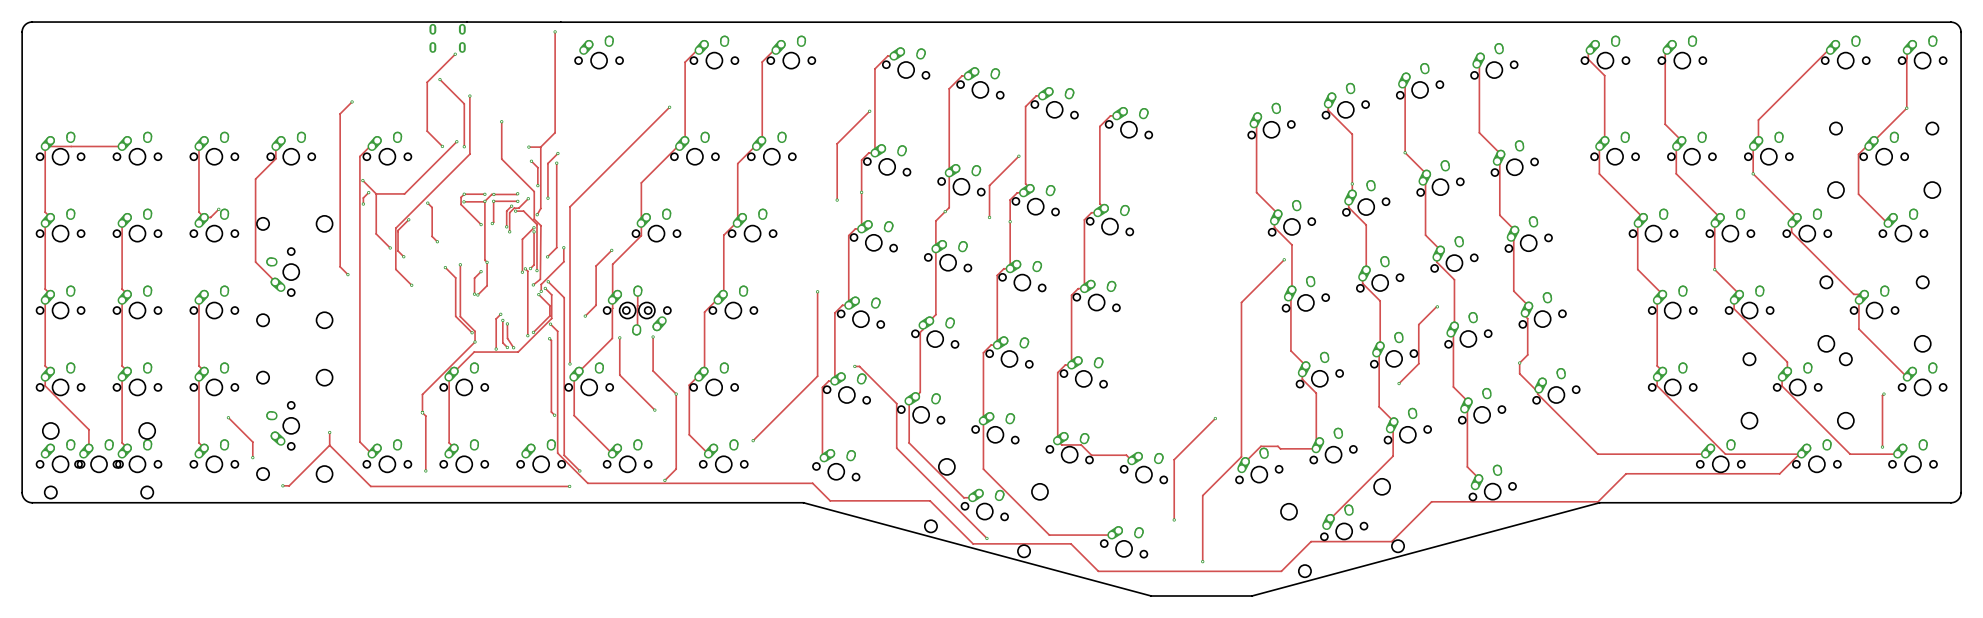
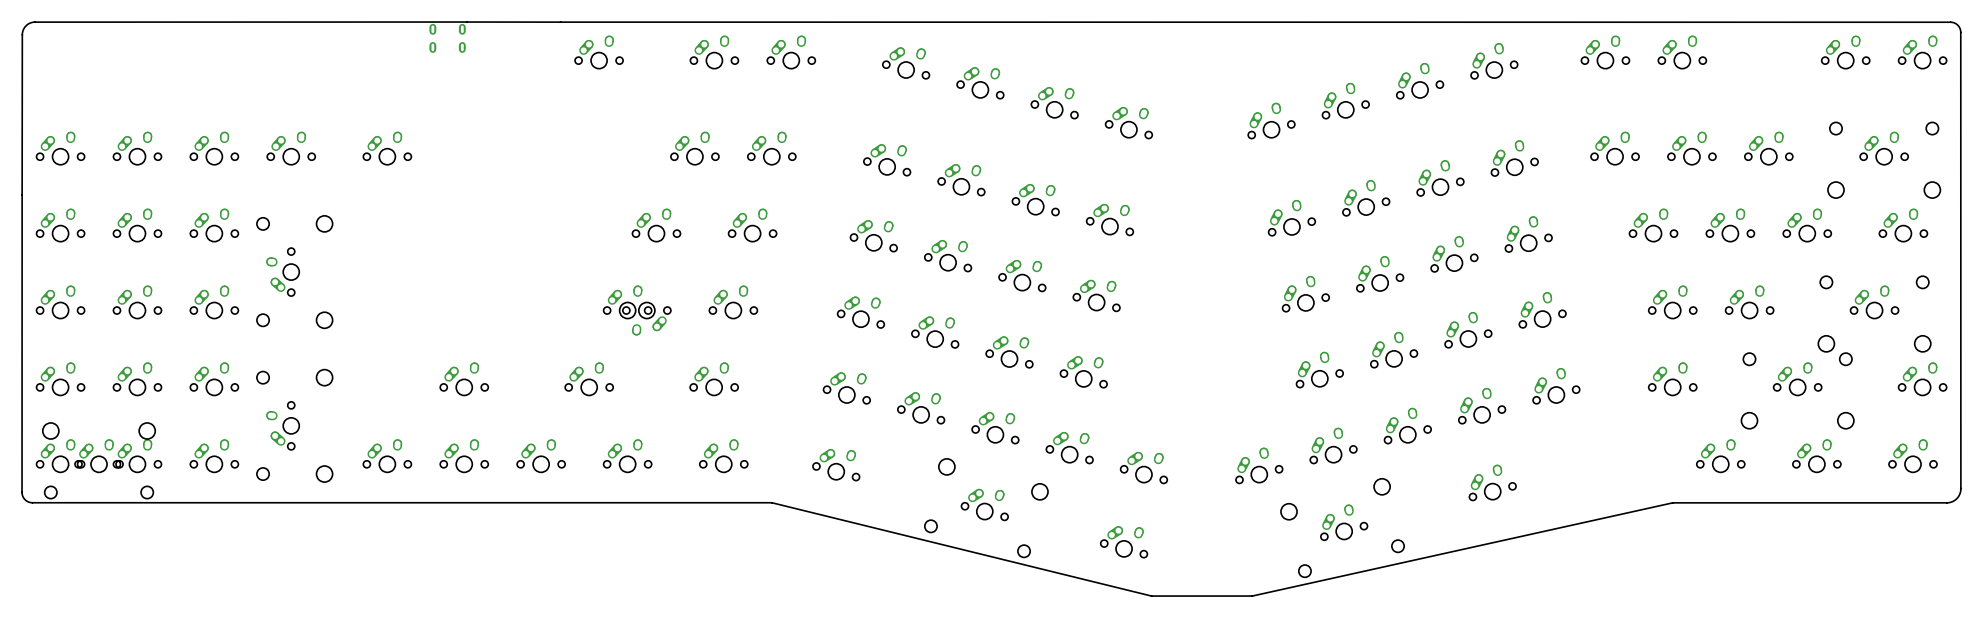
track: (555, 31) (555, 132) (540, 147) (528, 147) -> none
via: (555, 31) -> none
track: (699, 50) (685, 62) (685, 140) -> none
track: (775, 50) (762, 62) (762, 140) -> none
track: (1588, 50) (1588, 59) (1604, 75) (1604, 140) -> none
track: (1665, 50) (1665, 124) (1681, 140) -> none
track: (1830, 50) (1758, 120) (1758, 140) -> none
track: (1907, 50) (1906, 108) (1858, 154) (1858, 194) (1887, 223) -> none
track: (455, 54) (427, 82) (427, 131) (442, 146) -> none
via: (455, 54) -> none
track: (893, 56) (887, 56) (874, 68) (874, 153) (868, 153) (861, 160) (861, 228) (855, 228) (848, 235) (848, 305) (842, 305) (834, 312) (834, 381) (828, 381) (822, 387) (822, 456) (824, 457) -> none
track: (1476, 64) (1479, 66) (1479, 132) (1500, 154) -> none
track: (968, 76) (962, 76) (949, 88) (949, 207) (935, 220) (935, 314) (929, 320) -> none
track: (439, 79) (464, 103) (464, 146) -> none
via: (439, 79) -> none
track: (1402, 84) (1405, 86) (1405, 152) (1426, 174) -> none
track: (1042, 95) (1036, 95) (1025, 106) (1025, 183) (1030, 188) -> none
track: (469, 96) (469, 154) (395, 228) (395, 269) (411, 285) -> none
via: (469, 96) -> none
track: (352, 101) (340, 113) (340, 266) (347, 274) -> none
via: (352, 101) -> none
track: (1328, 103) (1328, 110) (1352, 134) (1352, 194) -> none
track: (669, 107) (570, 206) (570, 363) -> none
via: (669, 107) -> none
via: (1906, 108) -> none
track: (869, 111) (837, 143) (837, 200) -> none
via: (869, 111) -> none
track: (1116, 115) (1110, 115) (1099, 126) (1099, 203) (1104, 208) -> none
track: (501, 121) (501, 159) (534, 191) (534, 219) (540, 225) (540, 279) (533, 284) -> none
via: (501, 121) -> none
track: (1254, 123) (1256, 126) (1256, 192) (1278, 213) -> none
track: (456, 141) (404, 193) (376, 193) -> none
via: (456, 141) -> none
track: (122, 146) (45, 146) (45, 212) (50, 217) -> none
track: (198, 146) (198, 212) (204, 217) (210, 217) (218, 209) -> none
track: (275, 146) (275, 158) (255, 179) (255, 262) (281, 287) -> none
track: (371, 146) (359, 156) (359, 441) (371, 454) -> none
via: (442, 146) -> none
via: (464, 146) -> none
track: (679, 146) (641, 182) (641, 235) (612, 264) (612, 338) (579, 371) -> none
track: (756, 146) (737, 163) (737, 223) (723, 235) (723, 294) -> none
track: (1599, 146) (1599, 173) (1643, 217) -> none
track: (1676, 146) (1676, 173) (1720, 217) -> none
track: (1753, 146) (1753, 173) (1796, 217) -> none
via: (528, 147) -> none
track: (540, 147) (540, 208) (537, 214) -> none
via: (1405, 152) -> none
track: (557, 153) (547, 163) (547, 198) -> none
via: (557, 153) -> none
track: (1018, 156) (989, 185) (989, 217) -> none
via: (1018, 156) -> none
track: (531, 161) (537, 167) (537, 185) -> none
via: (531, 161) -> none
track: (1497, 161) (1499, 163) (1499, 215) (1514, 230) -> none
track: (556, 163) (556, 247) (547, 256) -> none
via: (556, 163) -> none
via: (1753, 173) -> none
track: (362, 180) (376, 193) -> none
via: (362, 180) -> none
track: (1422, 181) (1425, 183) (1425, 235) (1440, 250) -> none
via: (1352, 183) -> none
via: (537, 185) -> none
track: (368, 192) (363, 197) (363, 204) -> none
via: (368, 192) -> none
via: (861, 192) -> none
track: (1023, 192) (1017, 192) (1010, 199) (1010, 268) (1003, 268) (997, 275) (997, 345) (991, 345) (983, 352) (983, 469) (1049, 535) (1112, 535) -> none
track: (376, 193) (376, 233) (390, 247) -> none
track: (517, 193) (491, 194) (484, 201) (464, 201) -> none
via: (517, 193) -> none
via: (464, 194) -> none
track: (484, 194) (464, 194) (461, 197) (461, 204) (481, 224) -> none
via: (484, 194) -> none
via: (493, 194) -> none
track: (528, 198) (518, 208) (514, 208) (509, 212) (509, 231) -> none
via: (528, 198) -> none
via: (547, 198) -> none
via: (837, 200) -> none
via: (464, 201) -> none
track: (484, 201) (484, 260) (487, 262) (487, 285) (477, 294) -> none
via: (484, 201) -> none
via: (493, 201) -> none
track: (517, 201) (493, 201) (492, 223) -> none
via: (517, 201) -> none
track: (1348, 201) (1348, 207) (1366, 225) (1366, 270) -> none
track: (427, 203) (432, 207) (432, 236) (437, 241) -> none
via: (427, 203) -> none
via: (363, 204) -> none
track: (511, 206) (506, 211) (506, 226) -> none
via: (511, 206) -> none
via: (218, 209) -> none
track: (515, 211) (523, 211) (536, 224) (536, 270) -> none
via: (515, 211) -> none
via: (945, 211) -> none
track: (1097, 212) (1091, 212) (1084, 219) (1084, 288) (1078, 288) (1071, 295) (1071, 365) (1065, 365) (1057, 372) (1057, 440) (1061, 444) (1081, 444) (1091, 455) (1126, 455) (1131, 460) -> none
via: (537, 214) -> none
via: (989, 217) -> none
track: (408, 219) (398, 230) (398, 251) (403, 256) -> none
via: (408, 219) -> none
via: (1010, 221) -> none
track: (1274, 221) (1274, 227) (1291, 244) (1291, 289) -> none
track: (45, 223) (45, 289) (50, 294) -> none
track: (122, 223) (122, 289) (127, 294) -> none
via: (492, 223) -> none
track: (1637, 223) (1637, 269) (1662, 294) -> none
track: (1714, 223) (1714, 269) (1739, 294) -> none
track: (1791, 223) (1791, 232) (1853, 294) (1864, 294) -> none
via: (481, 224) -> none
via: (506, 226) -> none
track: (534, 227) (522, 239) (522, 272) -> none
via: (534, 227) -> none
via: (509, 231) -> none
track: (534, 231) (534, 264) (530, 268) -> none
via: (534, 231) -> none
track: (1511, 237) (1513, 239) (1513, 291) (1528, 306) -> none
via: (437, 241) -> none
via: (390, 247) -> none
track: (563, 247) (563, 261) (541, 284) (541, 291) -> none
via: (563, 247) -> none
track: (611, 250) (596, 266) (596, 305) (585, 316) -> none
via: (611, 250) -> none
via: (403, 256) -> none
via: (547, 256) -> none
track: (1436, 257) (1436, 262) (1454, 279) (1454, 326) -> none
track: (1284, 259) (1241, 302) (1241, 456) (1202, 495) (1202, 561) -> none
via: (1284, 259) -> none
via: (487, 262) -> none
track: (460, 264) (460, 316) (475, 331) (475, 341) (422, 394) (422, 412) (425, 416) (425, 470) -> none
via: (460, 264) -> none
track: (445, 267) (455, 277) (455, 316) (472, 332) -> none
via: (445, 267) -> none
track: (525, 268) (527, 271) (527, 335) -> none
via: (525, 268) -> none
via: (530, 268) -> none
via: (1714, 269) -> none
via: (536, 270) -> none
track: (481, 271) (474, 278) (474, 294) -> none
via: (481, 271) -> none
via: (522, 272) -> none
via: (347, 274) -> none
track: (1362, 277) (1362, 283) (1380, 301) (1380, 345) -> none
track: (548, 281) (564, 297) (564, 455) (579, 470) -> none
via: (548, 281) -> none
via: (533, 284) -> none
via: (411, 285) -> none
track: (545, 288) (551, 294) (551, 318) (518, 352) (474, 352) (449, 377) (449, 442) (454, 448) -> none
via: (545, 288) -> none
via: (541, 291) -> none
track: (817, 291) (817, 376) (753, 440) -> none
via: (817, 291) -> none
track: (637, 292) (636, 331) -> none
via: (474, 294) -> none
via: (477, 294) -> none
track: (538, 294) (549, 305) (549, 316) (533, 332) -> none
via: (538, 294) -> none
track: (1288, 297) (1290, 299) (1290, 350) (1305, 365) -> none
track: (45, 300) (45, 365) (50, 371) -> none
track: (122, 300) (122, 365) (127, 371) -> none
track: (198, 300) (198, 365) (204, 371) -> none
track: (718, 300) (704, 312) (704, 371) -> none
track: (1657, 300) (1657, 365) (1662, 371) -> none
track: (1734, 300) (1734, 308) (1787, 362) (1787, 371) -> none
track: (1858, 300) (1858, 329) (1907, 377) -> none
track: (1437, 306) (1418, 324) (1418, 363) (1399, 383) -> none
via: (1437, 306) -> none
track: (1525, 313) (1527, 318) (1527, 354) (1519, 363) (1519, 373) (1597, 454) (1705, 454) -> none
track: (500, 314) (496, 318) (496, 349) -> none
via: (500, 314) -> none
via: (585, 316) -> none
track: (502, 320) (502, 342) (507, 347) -> none
via: (502, 320) -> none
track: (507, 323) (507, 338) (513, 347) -> none
via: (507, 323) -> none
track: (550, 324) (557, 331) (557, 453) (587, 483) (812, 483) (830, 500) (930, 500) (973, 543) (1070, 543) (1098, 571) (1281, 571) (1311, 541) (1391, 541) (1431, 501) (1598, 501) (1626, 473) (1779, 473) (1799, 454) -> none
via: (550, 324) -> none
track: (923, 325) (923, 329) (920, 332) (920, 392) (915, 396) -> none
via: (472, 332) -> none
via: (533, 332) -> none
track: (1450, 333) (1453, 335) (1453, 387) (1468, 401) -> none
via: (527, 335) -> none
track: (653, 336) (653, 370) (676, 394) (676, 469) (664, 480) -> none
via: (653, 336) -> none
track: (619, 337) (619, 375) (654, 410) -> none
via: (619, 337) -> none
track: (549, 338) (551, 340) (551, 412) (554, 415) -> none
via: (549, 338) -> none
via: (475, 341) -> none
via: (507, 347) -> none
via: (513, 347) -> none
via: (496, 349) -> none
track: (1376, 352) (1379, 355) (1379, 406) (1394, 421) -> none
via: (570, 363) -> none
via: (1519, 363) -> none
track: (854, 366) (859, 366) (896, 403) (896, 448) (986, 538) -> none
via: (854, 366) -> none
track: (1302, 372) (1302, 379) (1316, 393) (1316, 448) (1280, 448) (1277, 446) (1260, 446) (1245, 461) -> none
track: (45, 377) (45, 385) (88, 429) (88, 448) -> none
track: (122, 377) (122, 442) (127, 448) -> none
track: (198, 377) (198, 442) (204, 448) -> none
track: (574, 377) (574, 415) (612, 454) -> none
track: (699, 377) (689, 385) (689, 434) (708, 454) -> none
track: (1657, 377) (1657, 385) (1725, 454) (1801, 454) -> none
track: (1782, 377) (1782, 386) (1850, 454) (1897, 454) -> none
via: (1399, 383) -> none
via: (676, 394) -> none
track: (1883, 394) (1882, 447) -> none
via: (1883, 394) -> none
track: (909, 401) (909, 443) (963, 497) (972, 497) -> none
track: (1464, 409) (1467, 411) (1467, 466) (1479, 478) -> none
via: (654, 410) -> none
via: (422, 412) -> none
via: (554, 415) -> none
track: (228, 417) (252, 442) (252, 457) -> none
via: (228, 417) -> none
track: (1215, 418) (1174, 459) (1174, 519) -> none
via: (1215, 418) -> none
track: (1390, 428) (1393, 431) (1393, 456) (1326, 522) (1326, 525) -> none
track: (329, 432) (329, 445) -> none
via: (329, 432) -> none
via: (753, 440) -> none
track: (329, 445) (289, 485) (282, 485) -> none
track: (329, 445) (370, 486) (569, 486) -> none
via: (1882, 447) -> none
via: (252, 457) -> none
via: (425, 470) -> none
via: (579, 470) -> none
via: (664, 480) -> none
via: (282, 485) -> none
via: (569, 486) -> none
board edge: (32, 502) (25, 499) (22, 492) (22, 32) (24, 25) (29, 22) (1950, 22) (1957, 24) (1960, 28) (1961, 492) (1959, 497) (1954, 501) (1599, 502) (1251, 595) (1151, 595) (803, 502) (771, 502) -> (32, 502) (25, 499) (22, 492) (22, 34) (24, 27) (31, 22) (1950, 22) (1955, 23) (1960, 28) (1960, 488) (1957, 497) (1951, 502) (1672, 502) (1252, 596) (1151, 596) (771, 502)
via: (1174, 519) -> none
via: (986, 538) -> none
via: (1202, 561) -> none

